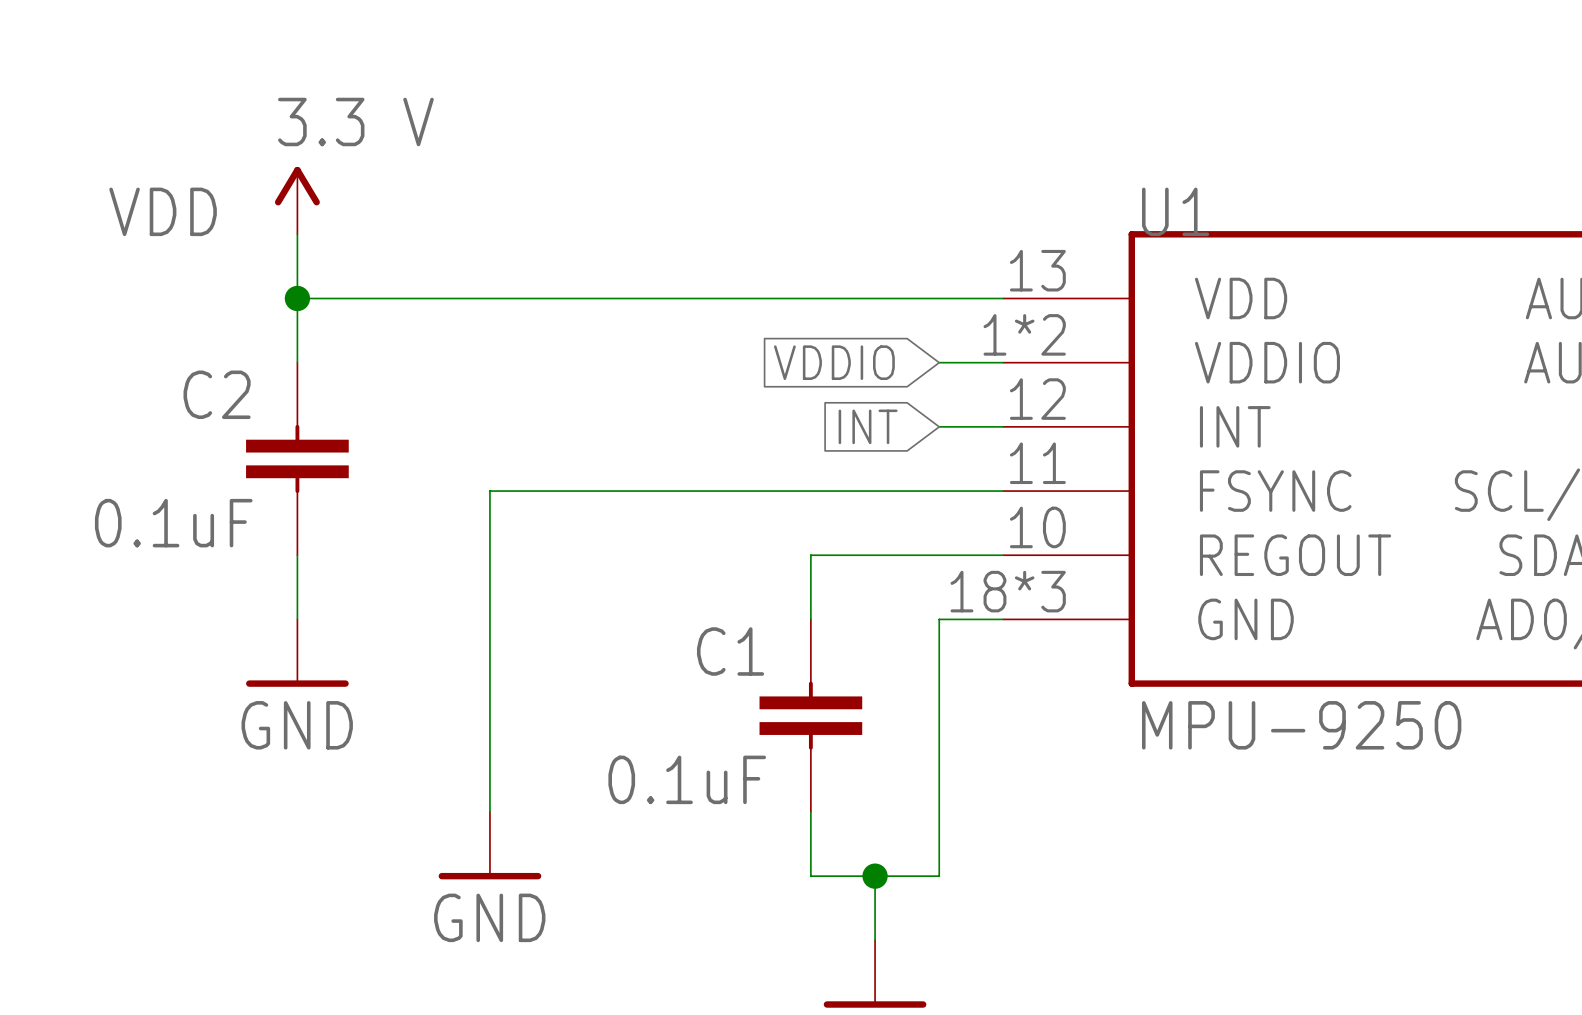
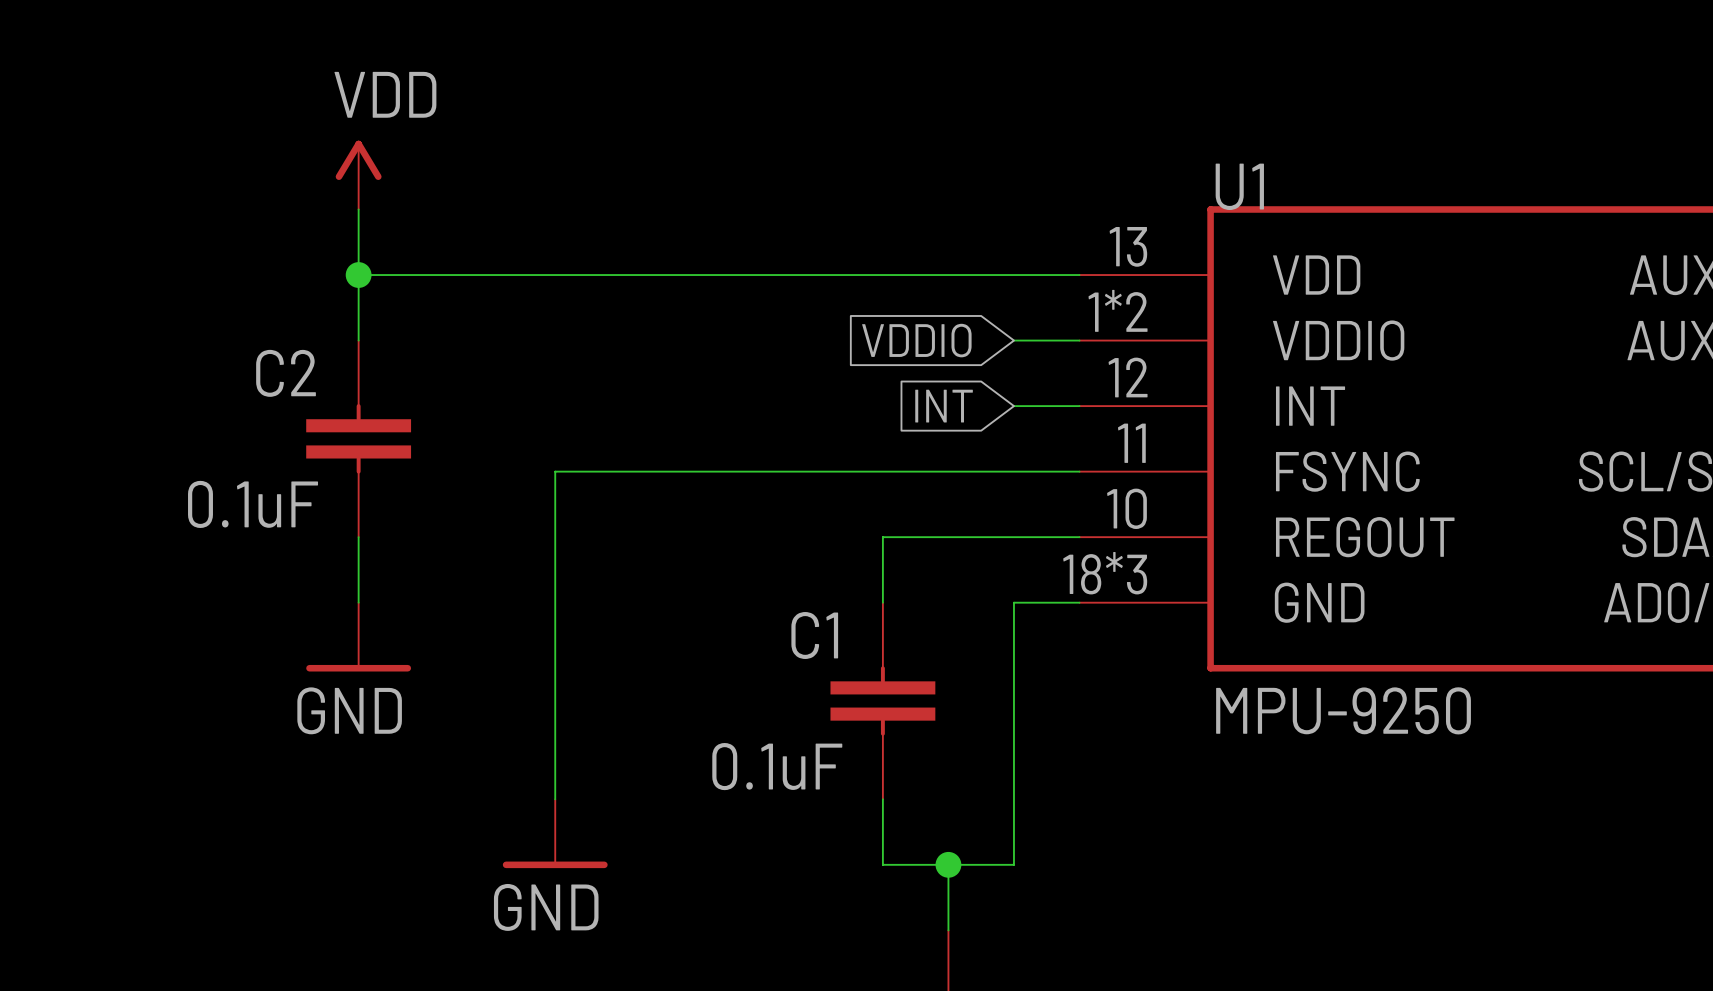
power symbol: 3.3 V (297, 200) -> VDD (358, 175)
text: VDD (163, 211) -> none

